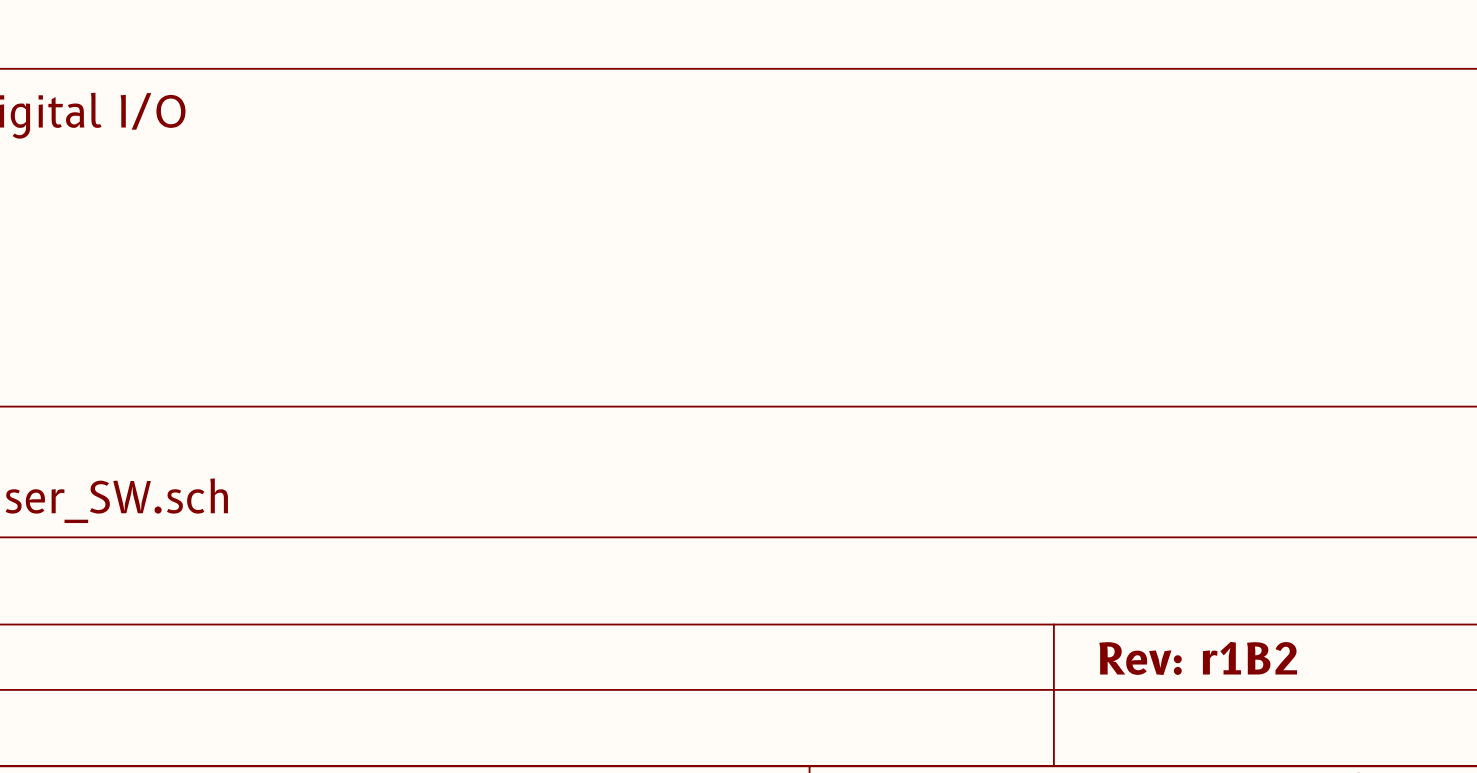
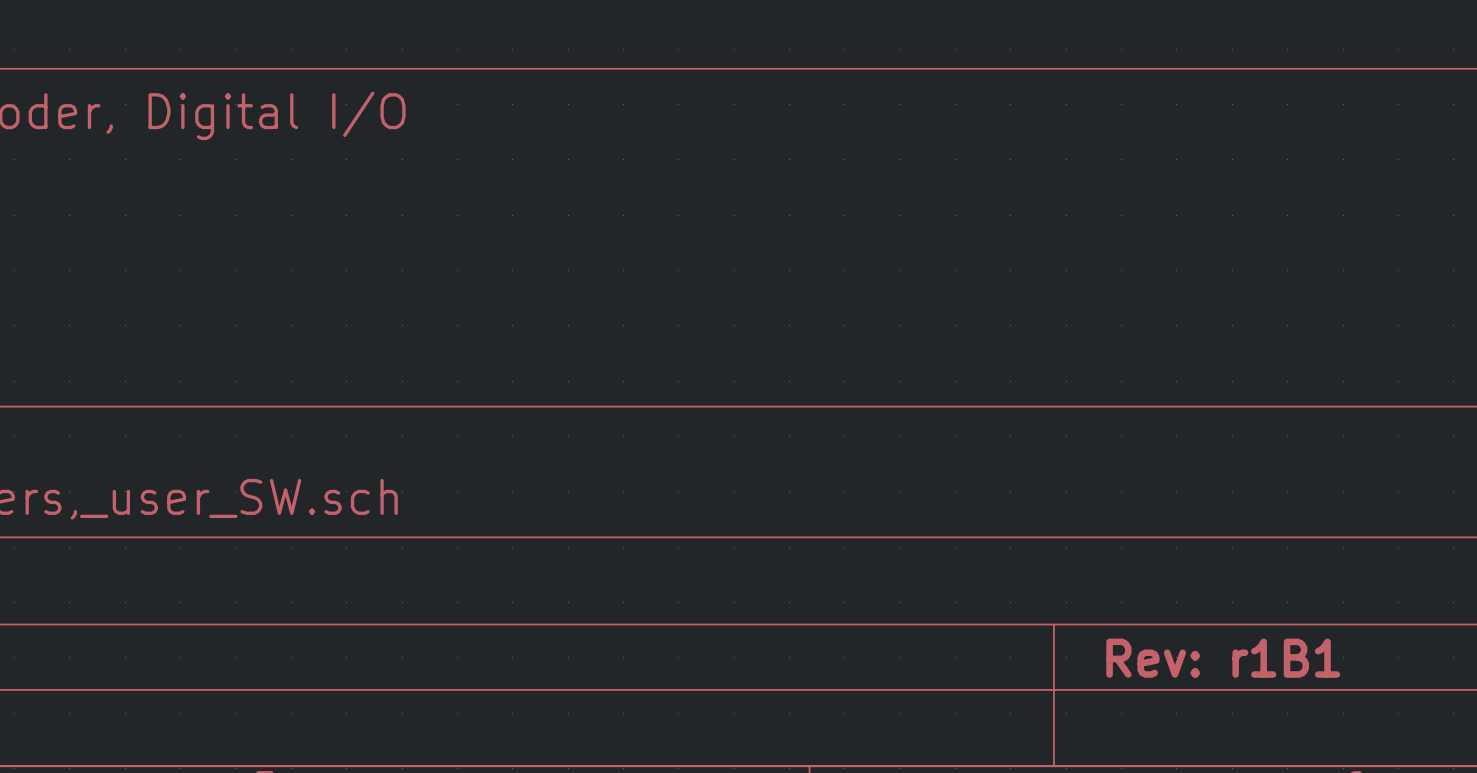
title block: Rev: r1B2 (1198, 658) -> Rev: r1B1 (1223, 658)

